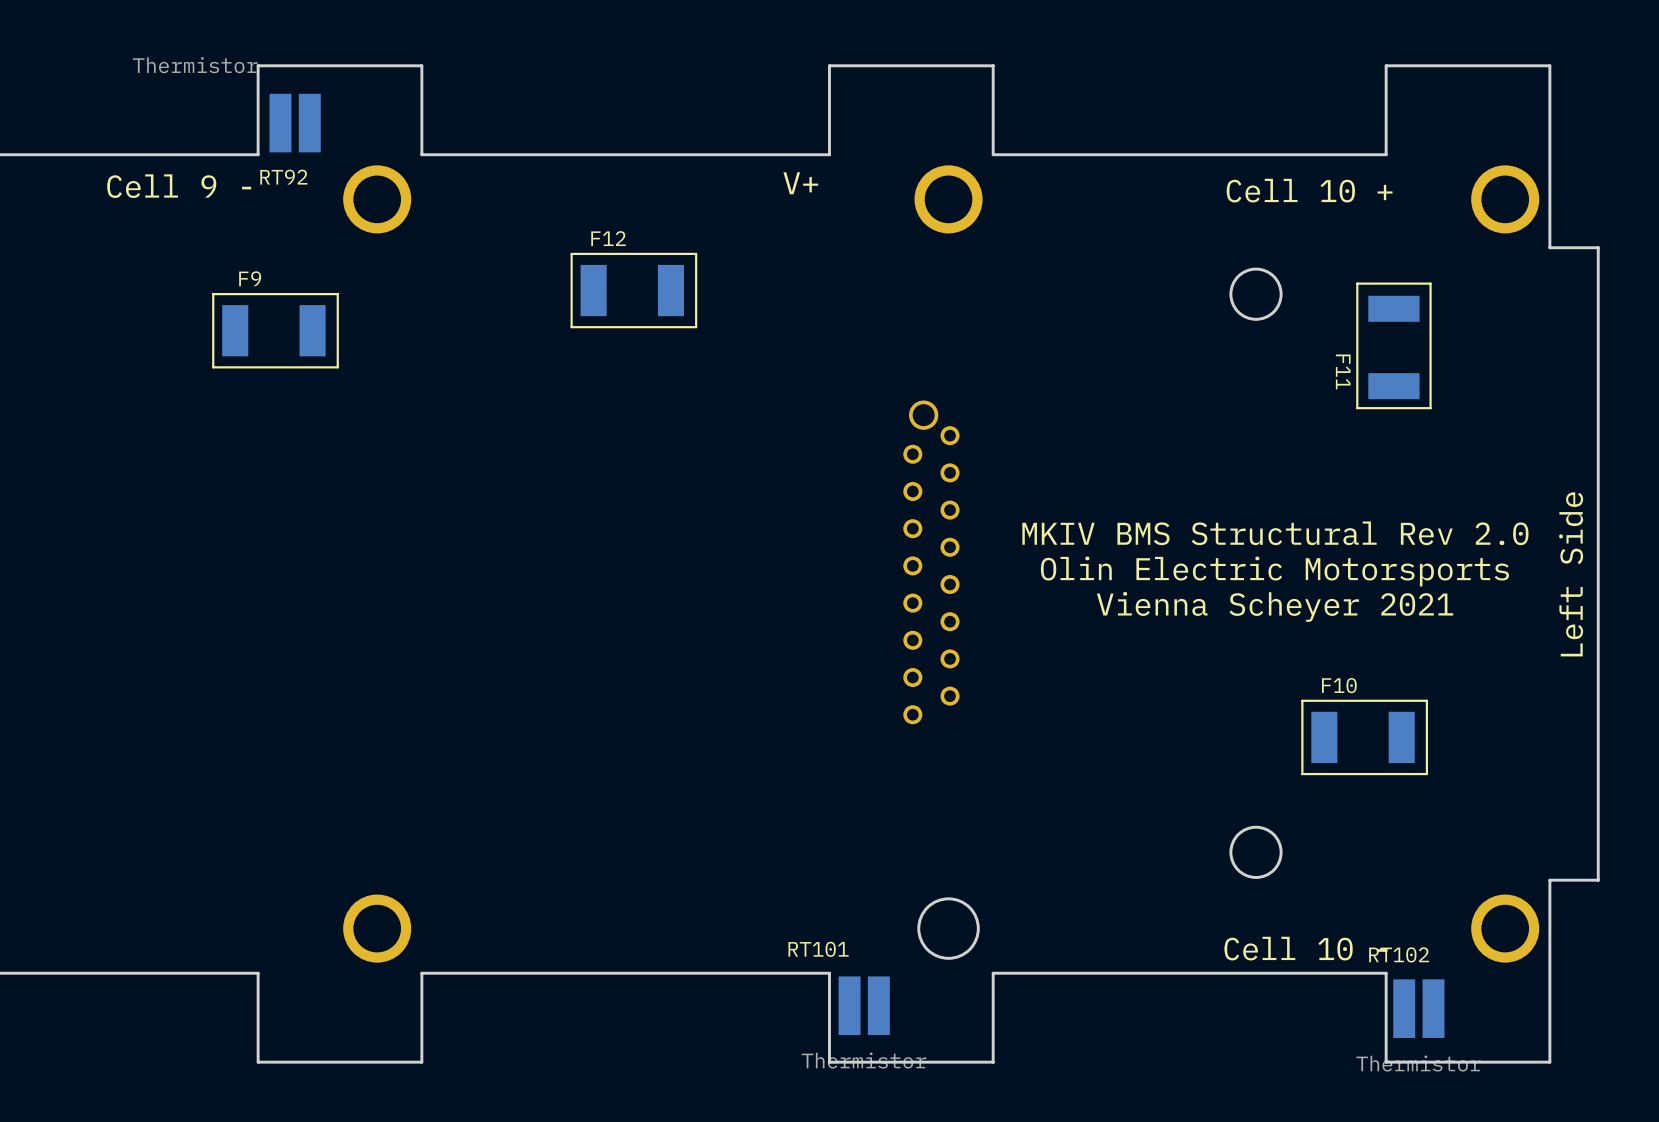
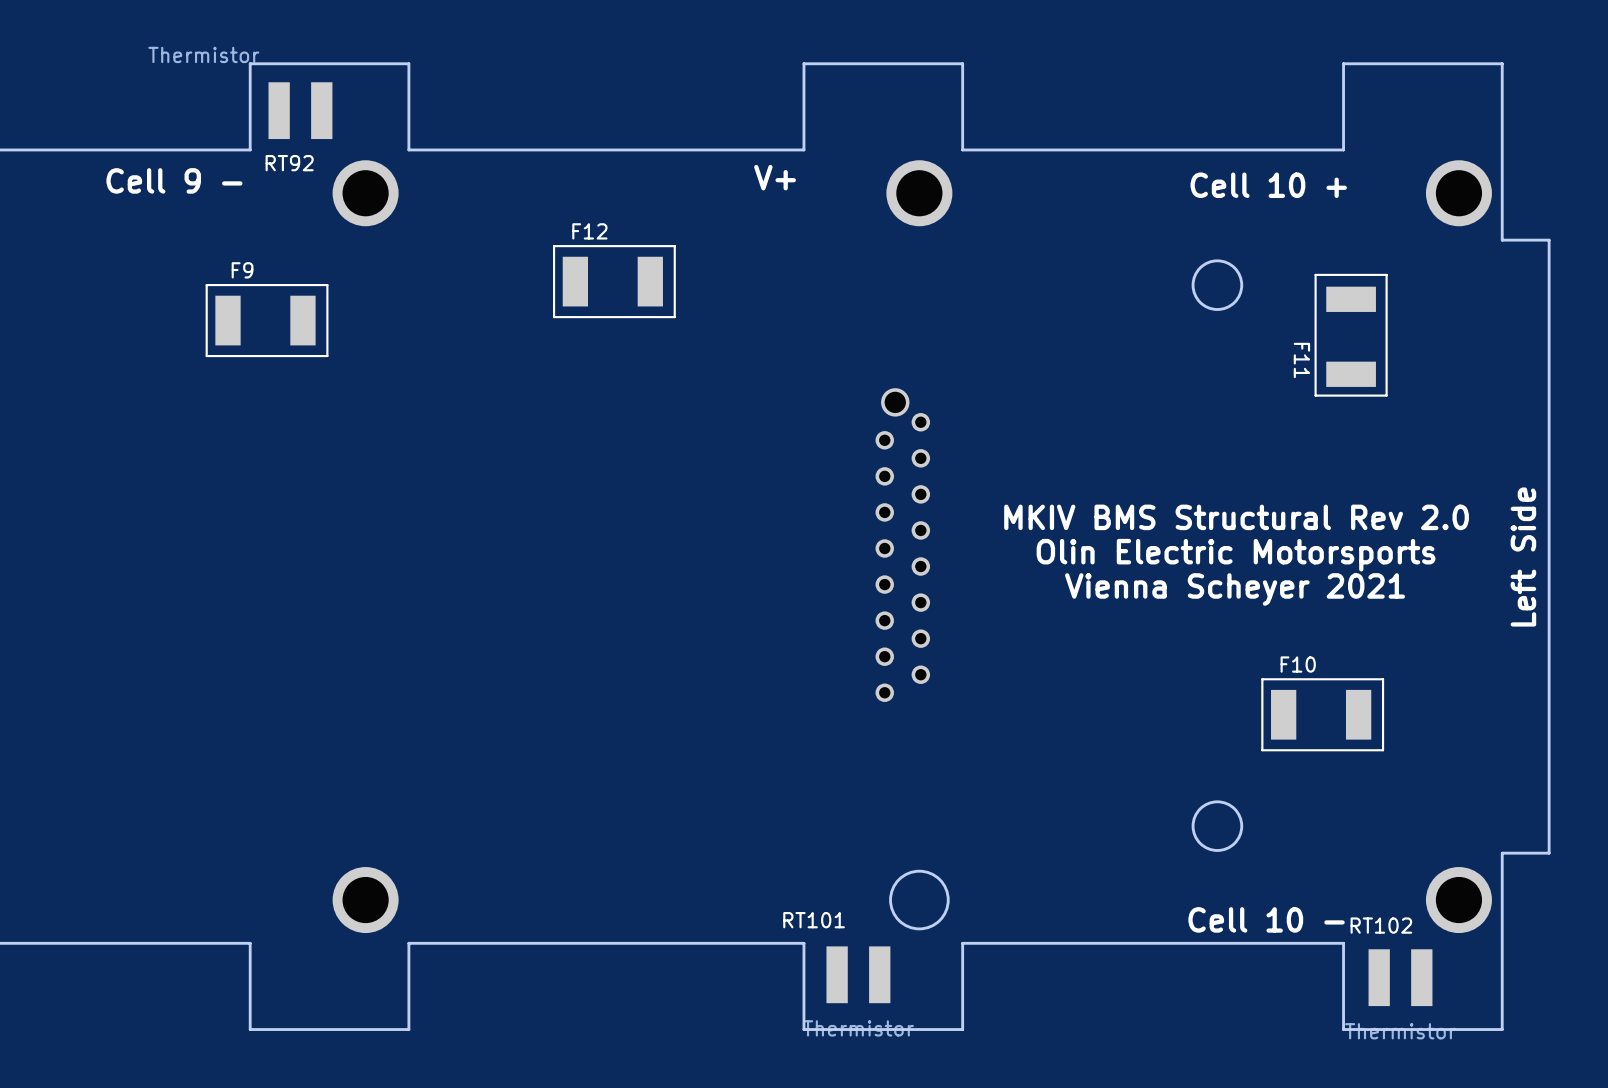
RT92 footprint: [269, 93, 321, 153] -> [268, 82, 333, 140]
RT101 footprint: [838, 976, 890, 1036] -> [826, 946, 891, 1004]
RT102 footprint: [1393, 979, 1445, 1038] -> [1368, 949, 1433, 1007]

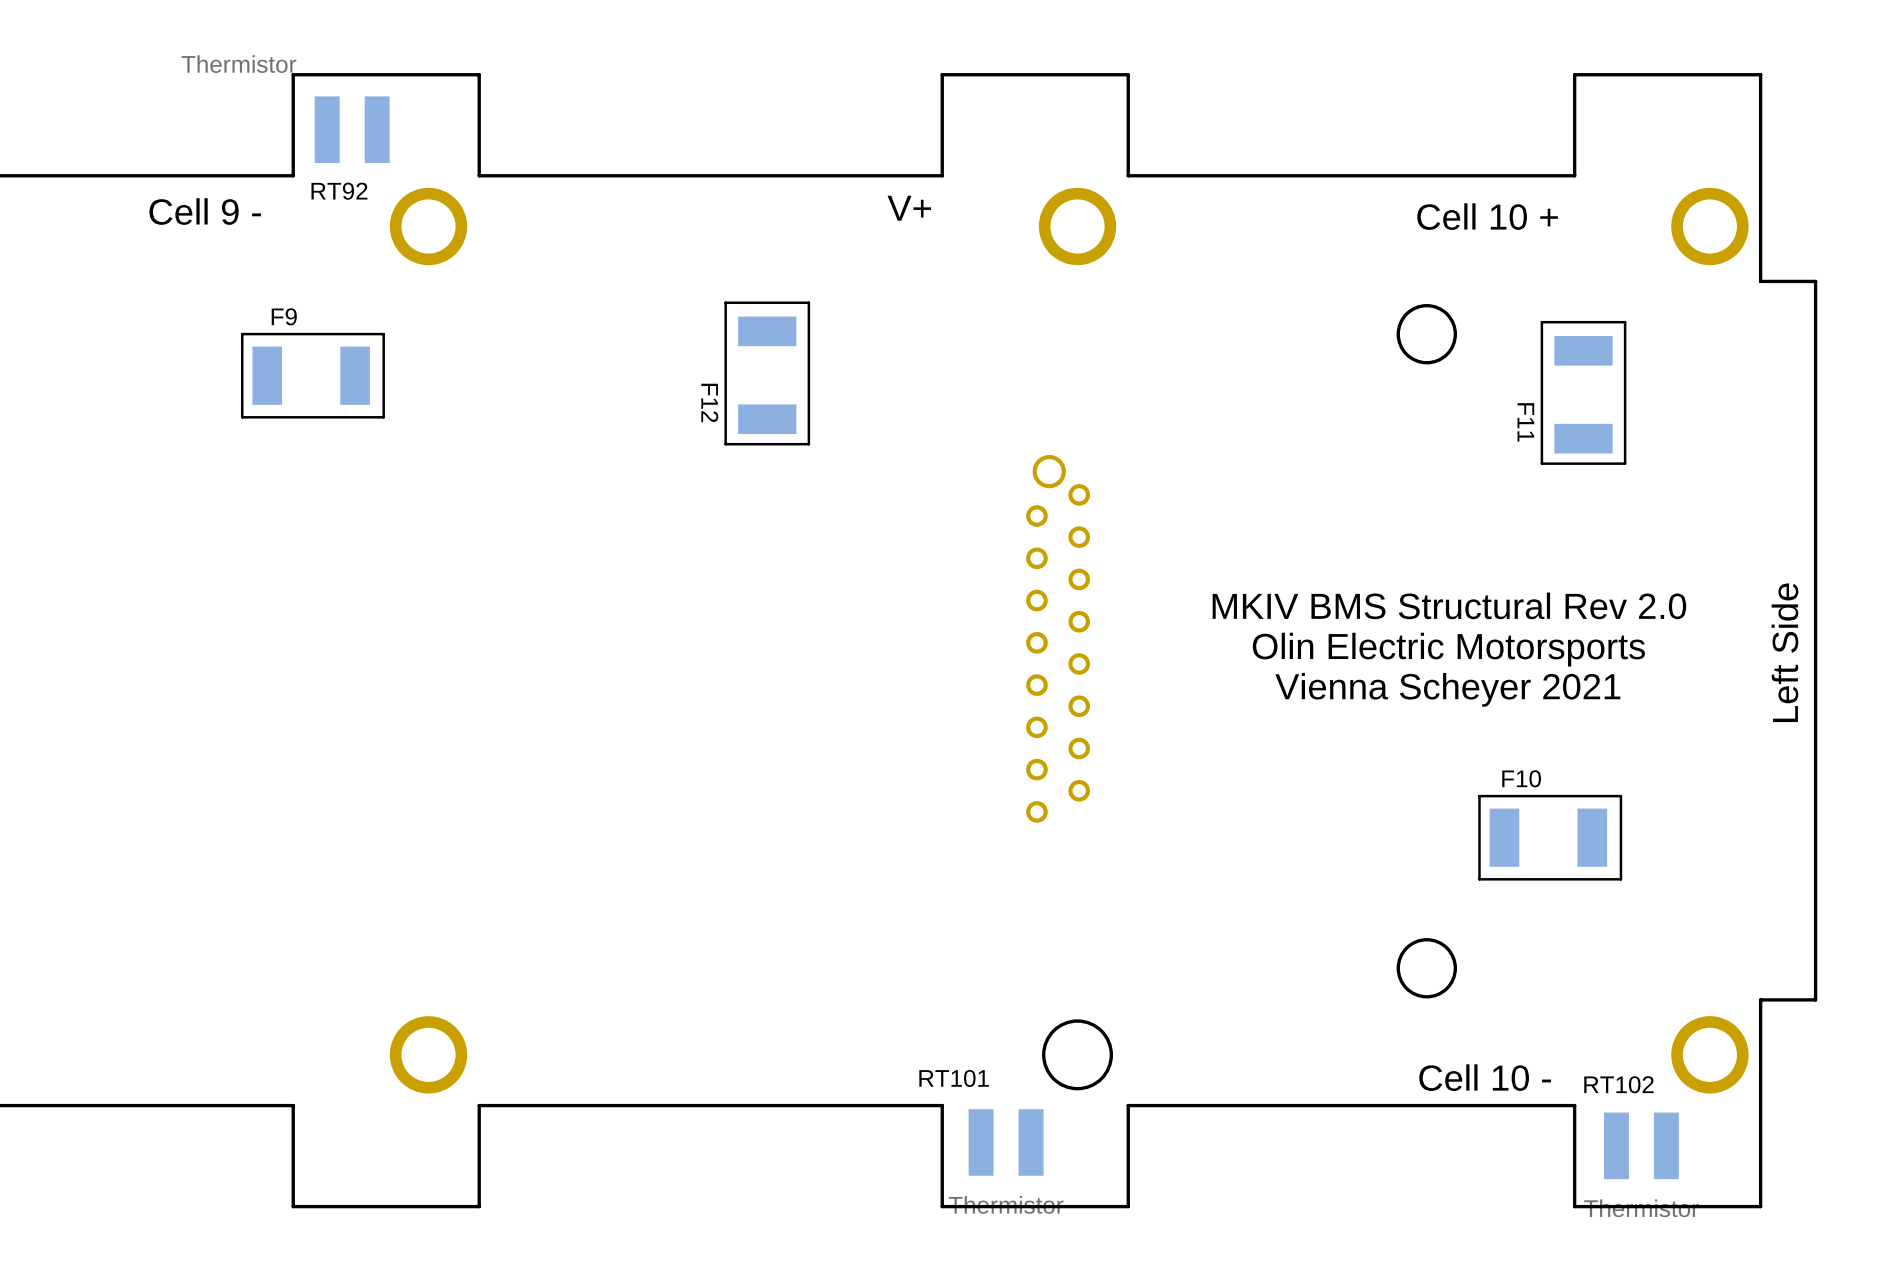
F12 rotation: 0° (614, 281) -> 90° counterclockwise (767, 373)

